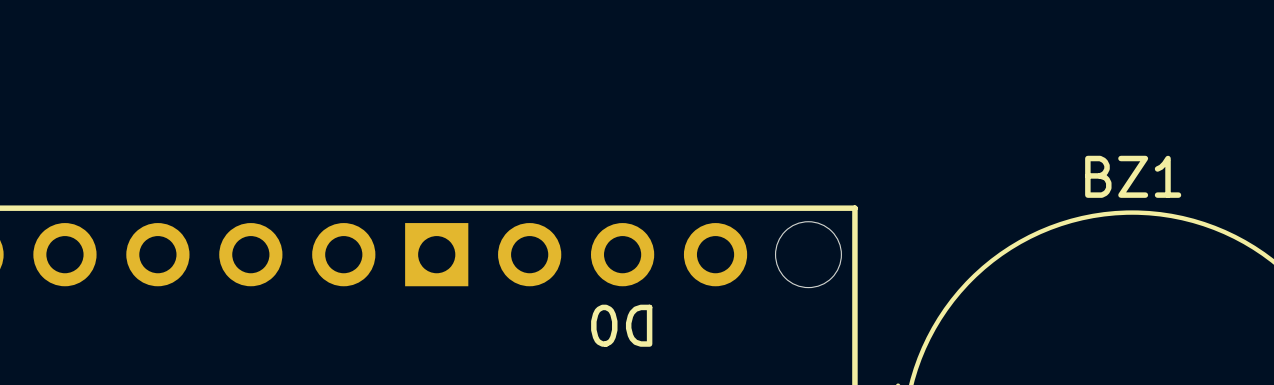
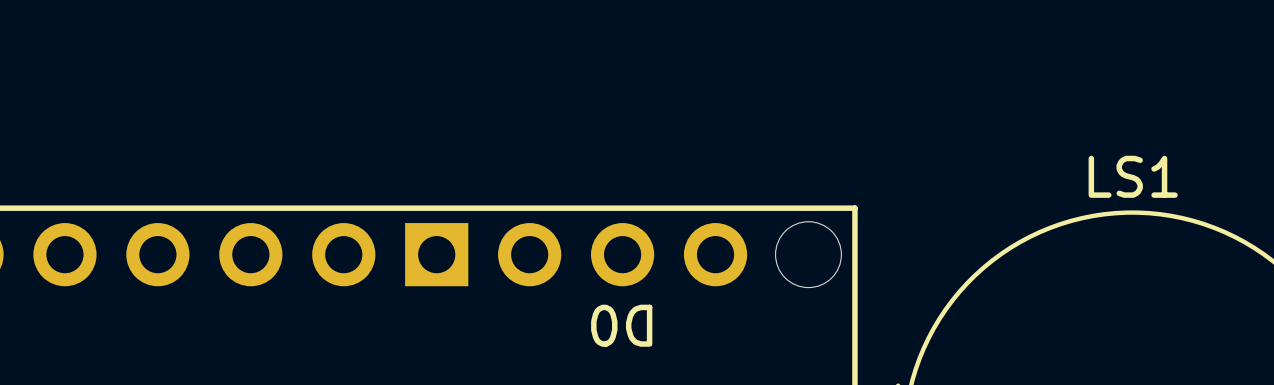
BZ1 name: BZ1 (1133, 176) -> LS1 (1133, 176)

